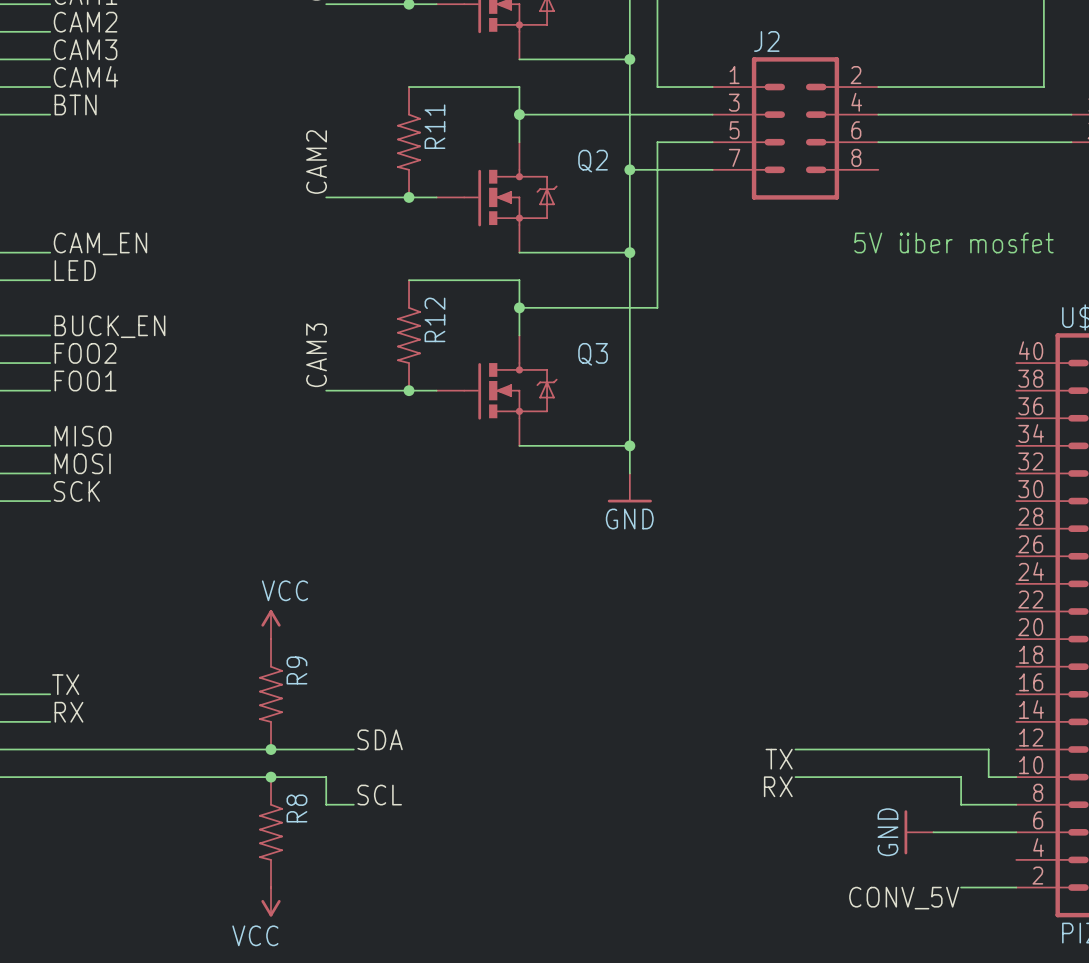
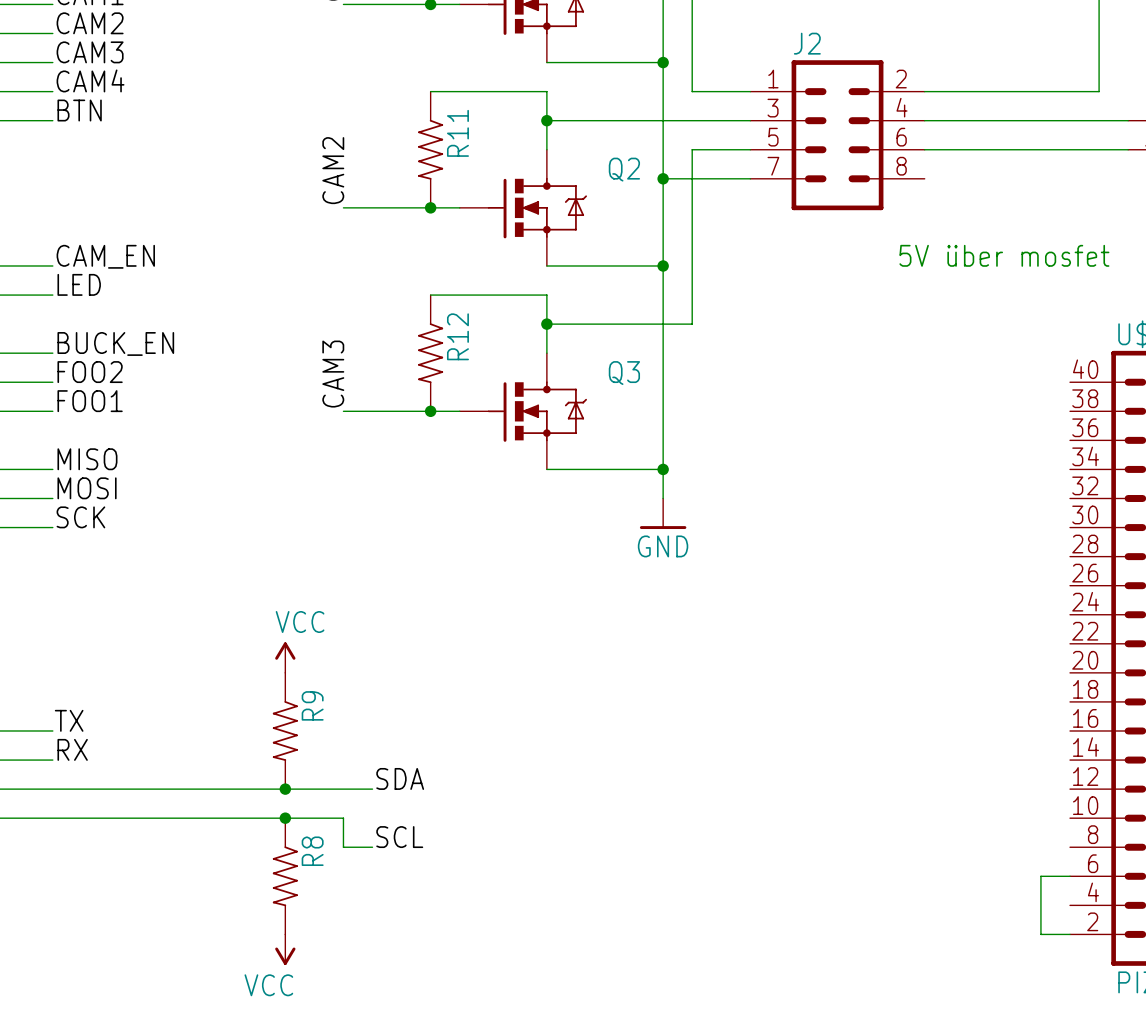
wire: (795, 749) (988, 749) (988, 777) (1016, 777) -> none
label: TX (779, 759) -> none
wire: (795, 777) (961, 777) (961, 804) (1016, 804) -> none
label: RX (778, 786) -> none
power symbol: GND (919, 832) -> none
wire: (933, 832) (988, 832) -> none
wire: (961, 887) (988, 887) -> (1040, 876) (1040, 934)
label: CONV_5V (904, 898) -> none

